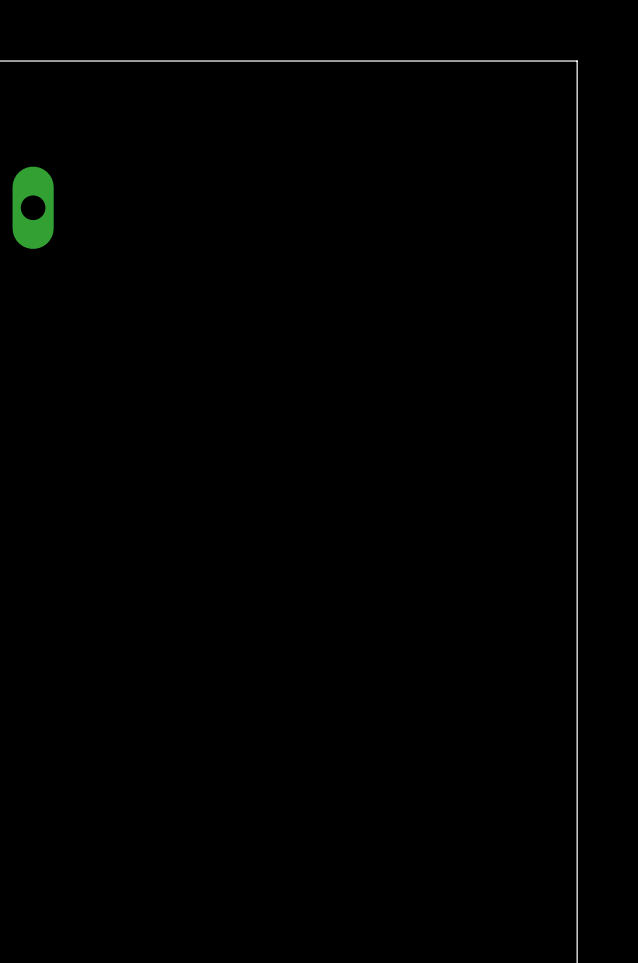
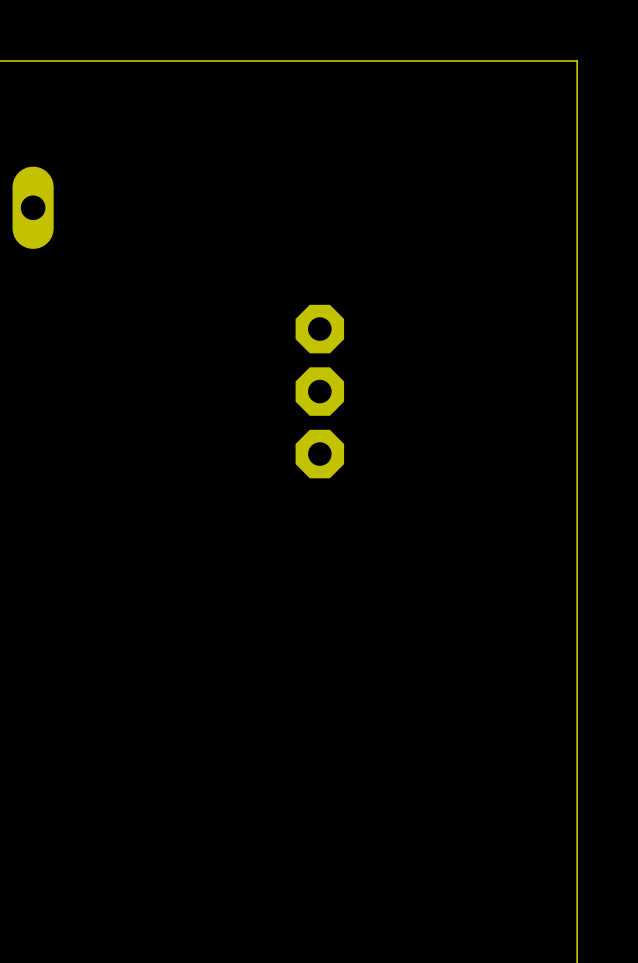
part: none -> (319, 391)

